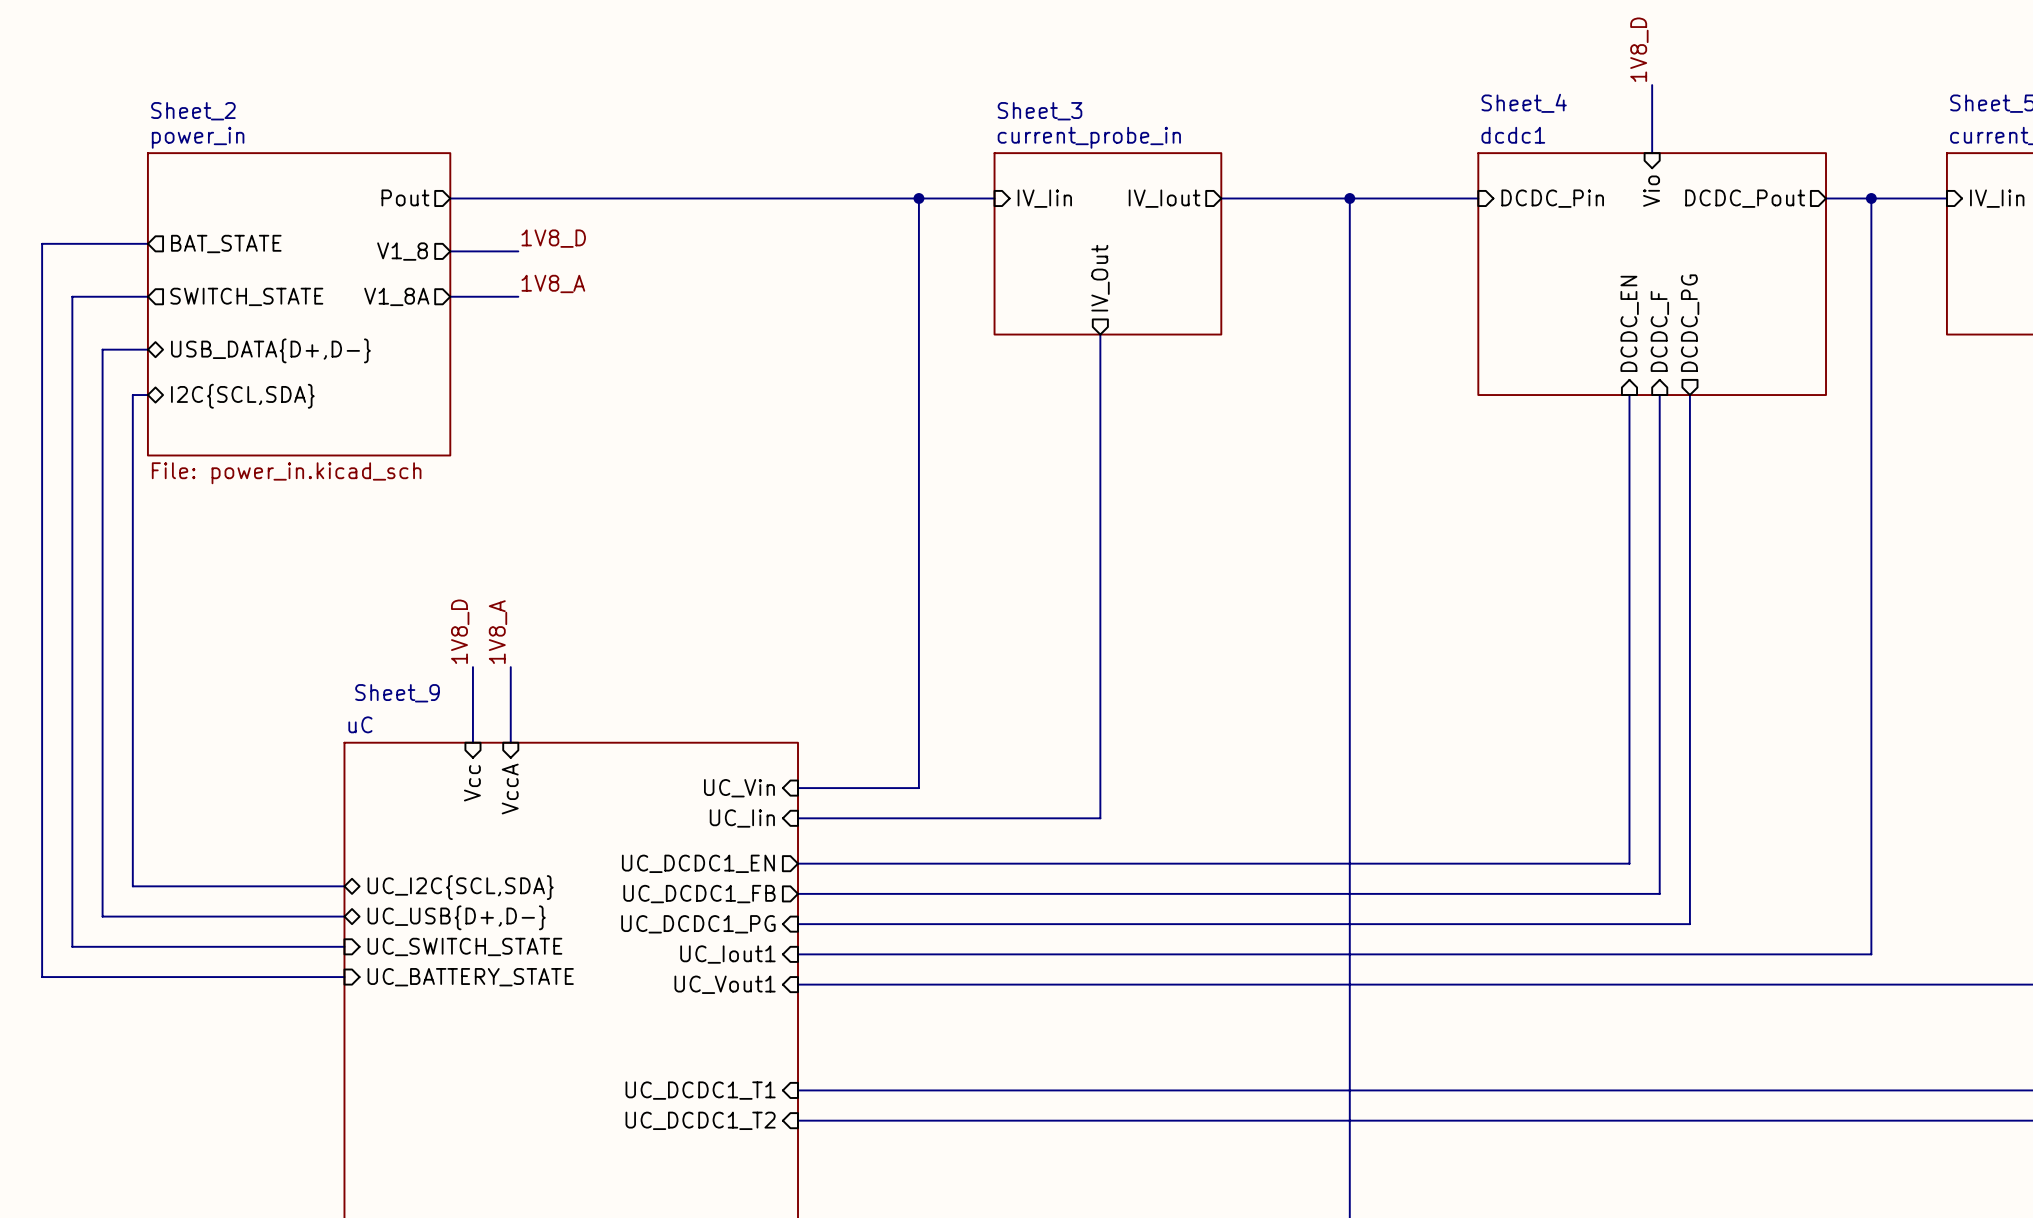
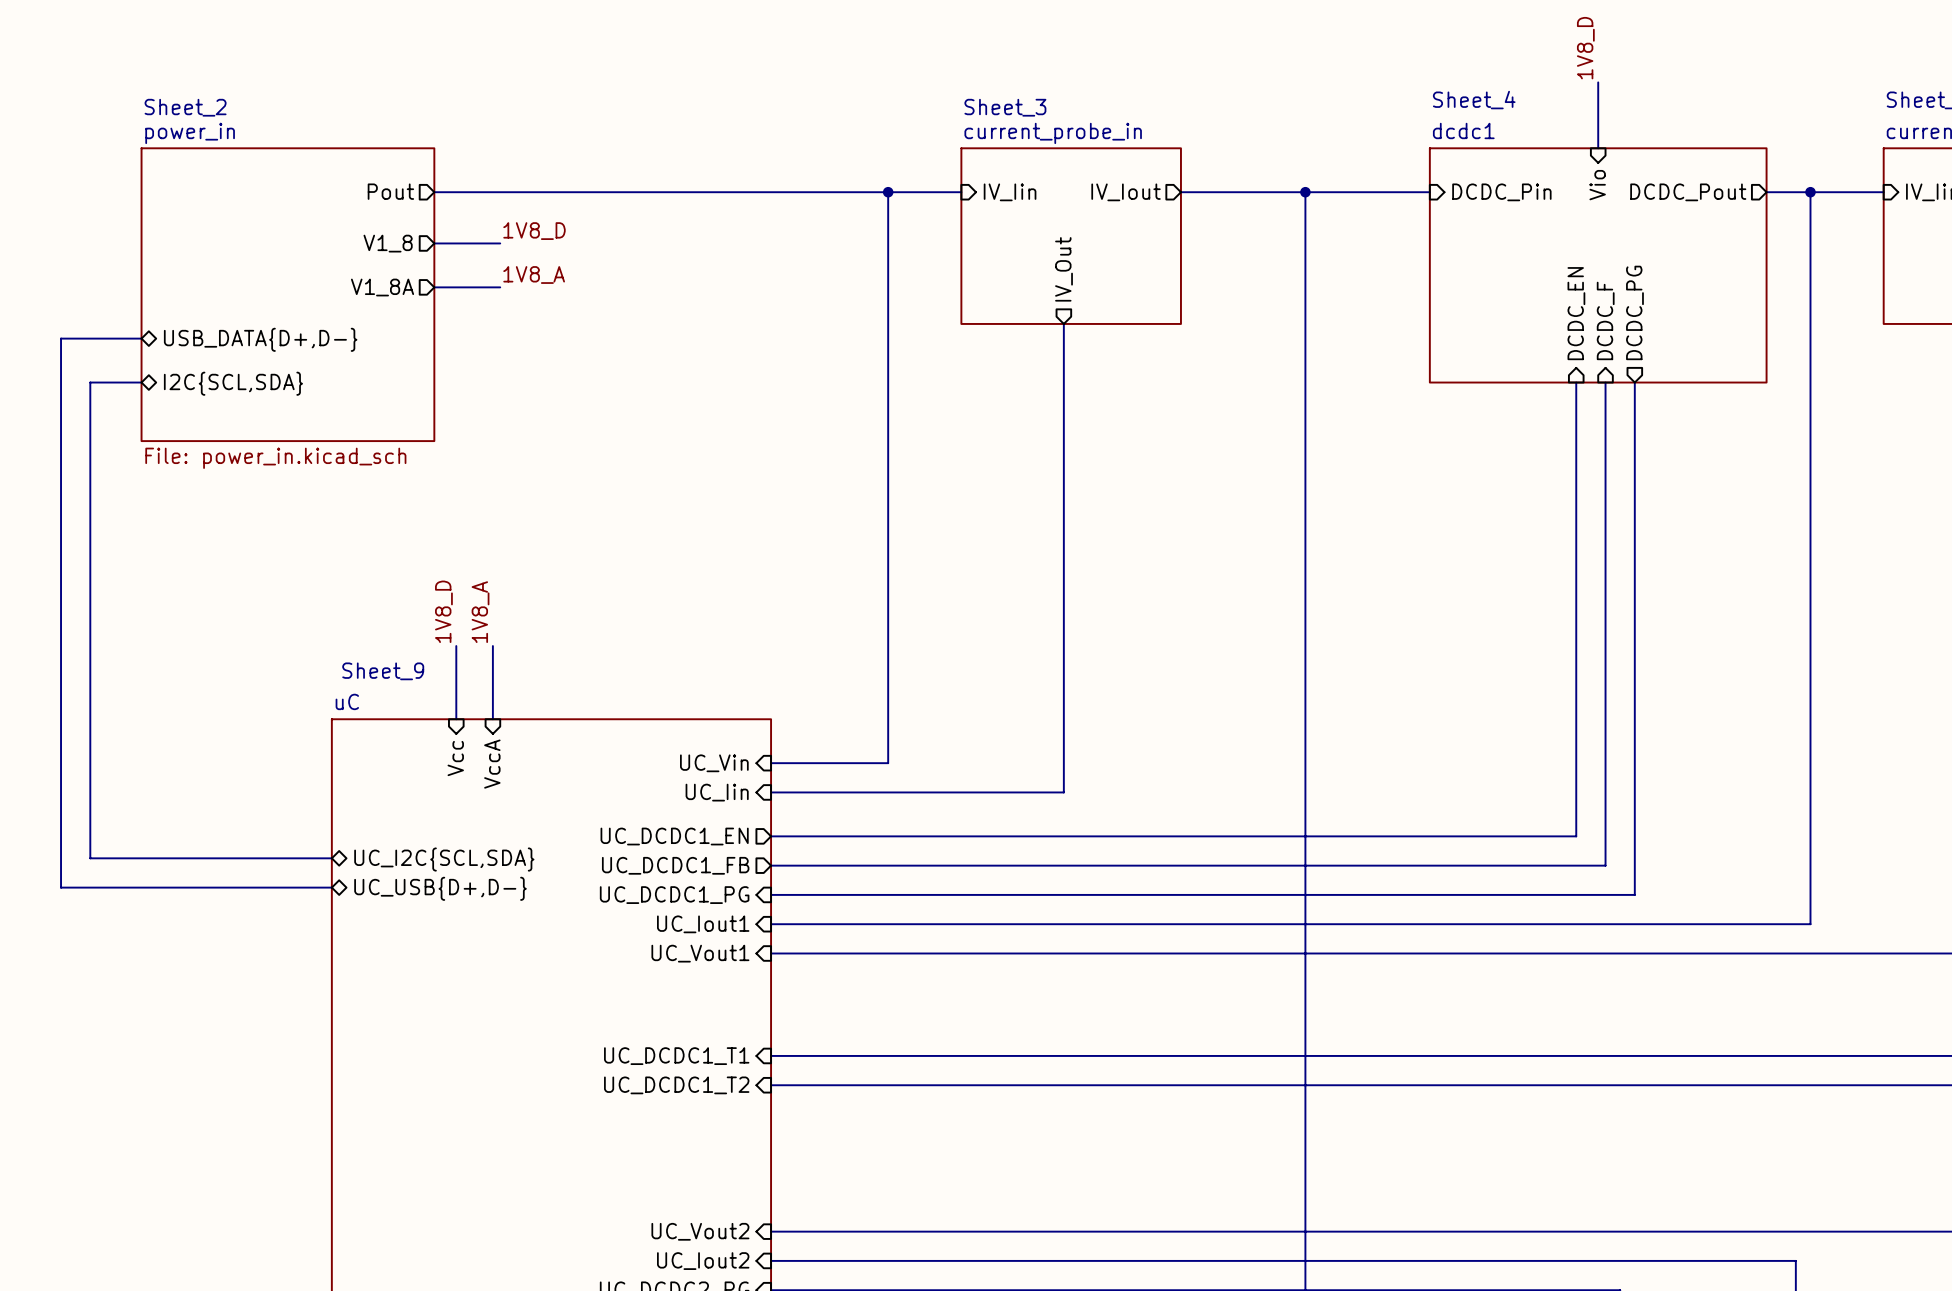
wire: (147, 243) (42, 243) (42, 977) (344, 977) -> none
sheet pin: BAT_STATE (226, 243) -> none
wire: (147, 296) (72, 296) (72, 946) (344, 946) -> none
sheet pin: SWITCH_STATE (246, 296) -> none
bus: (102, 349) (102, 916) -> (97, 338) (61, 338) (61, 887) (97, 887)
bus: (132, 395) (132, 886) -> (126, 382) (90, 382) (90, 858) (126, 858)
sheet pin: UC_SWITCH_STATE (464, 946) -> none
sheet pin: UC_BATTERY_STATE (470, 977) -> none

